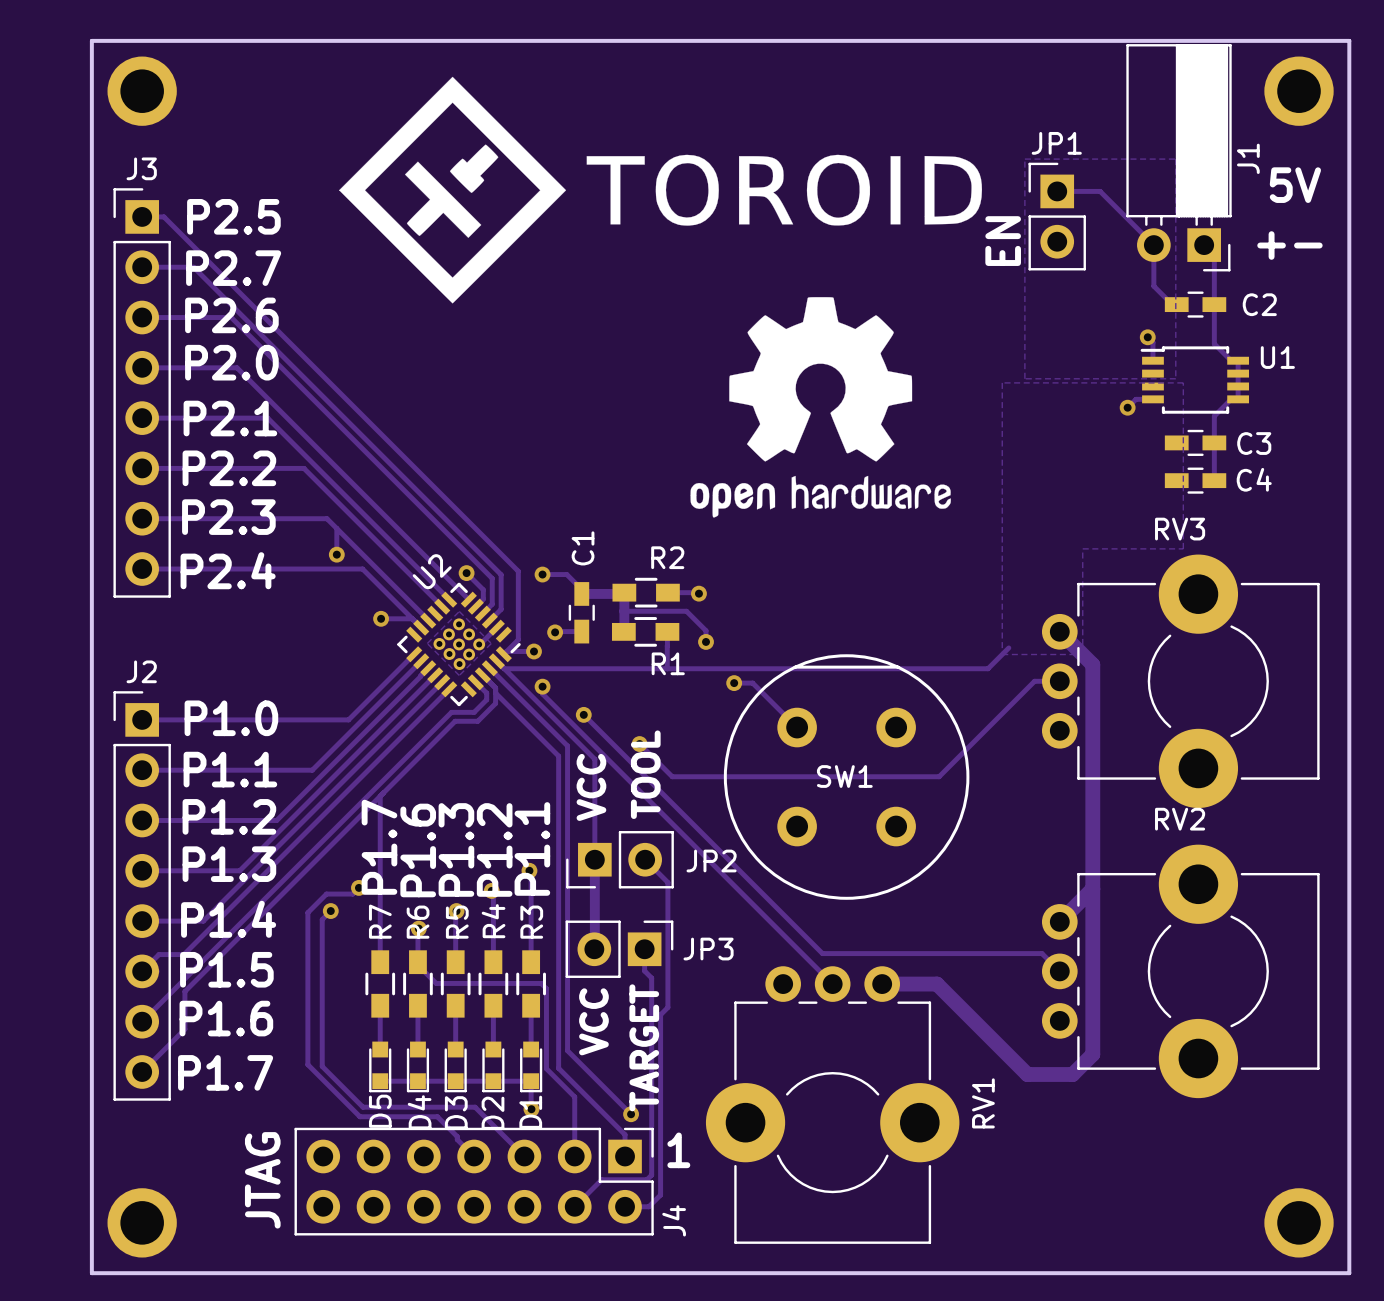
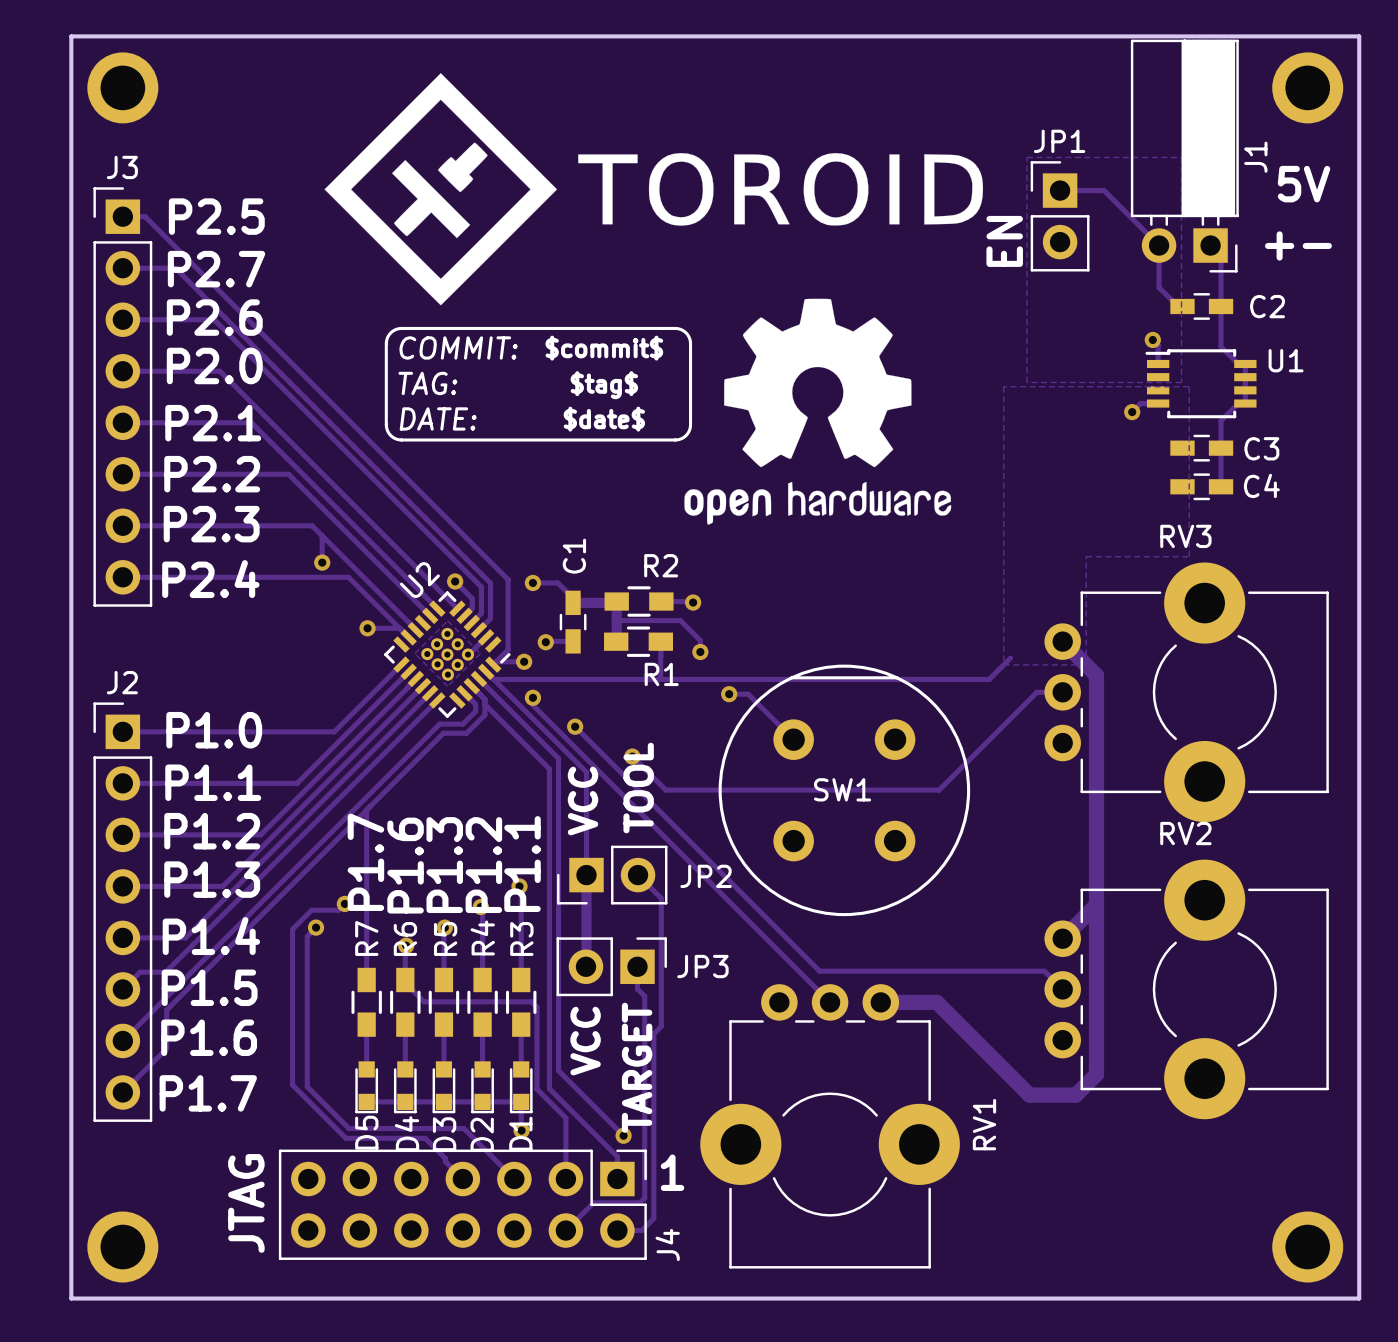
drawing: none -> [384, 326, 693, 442]

